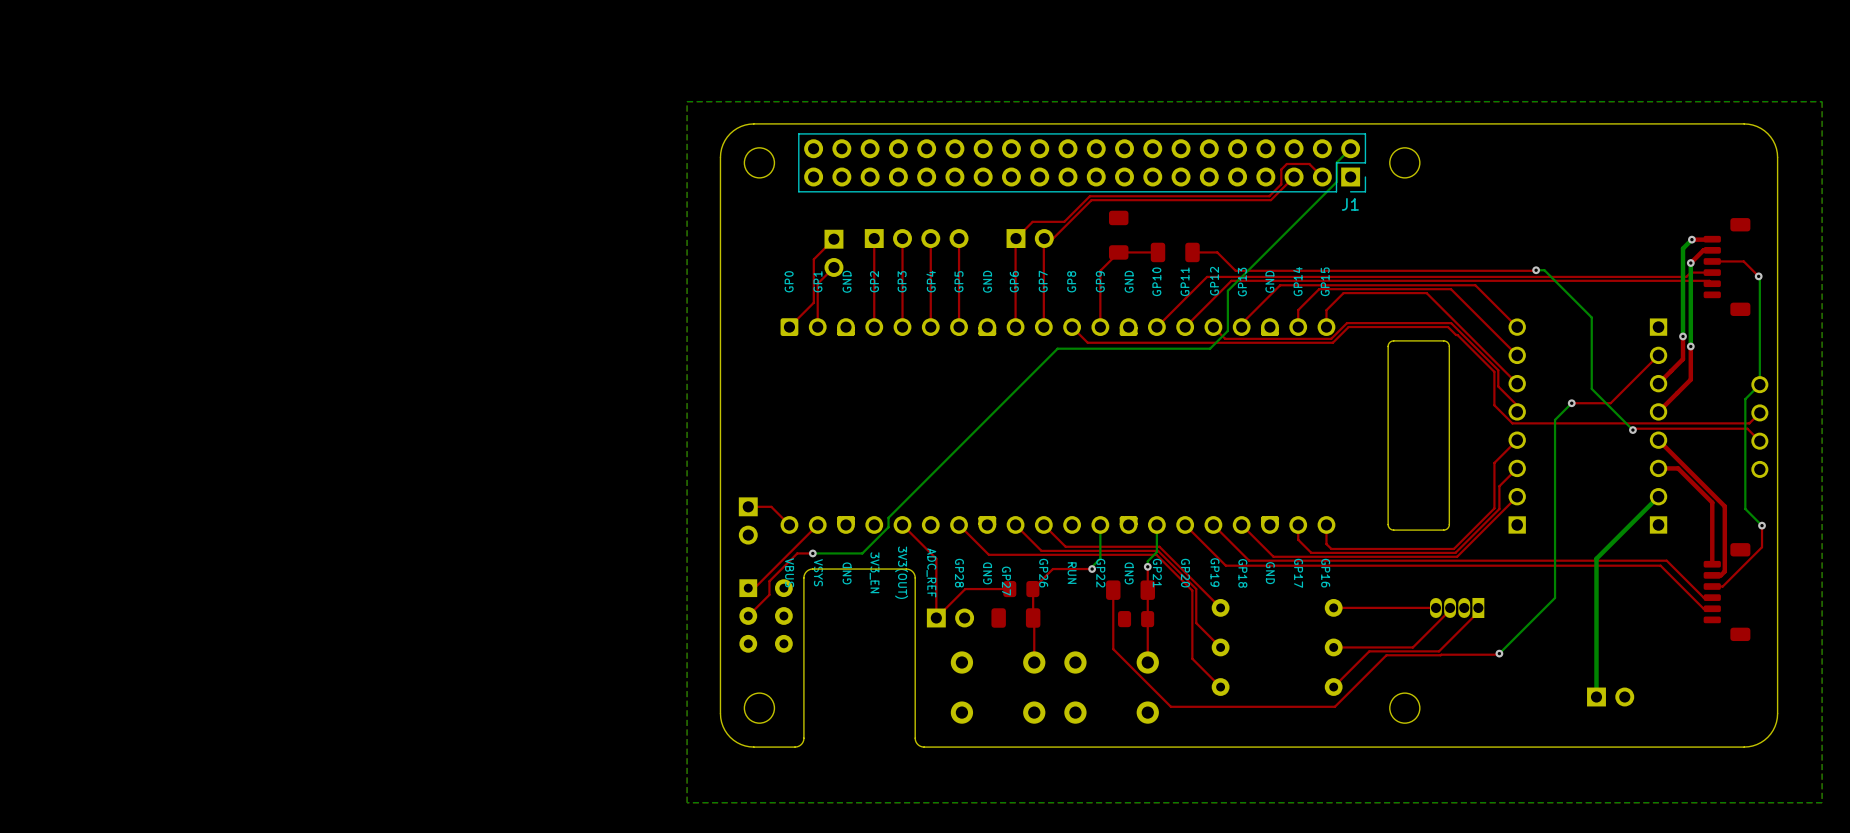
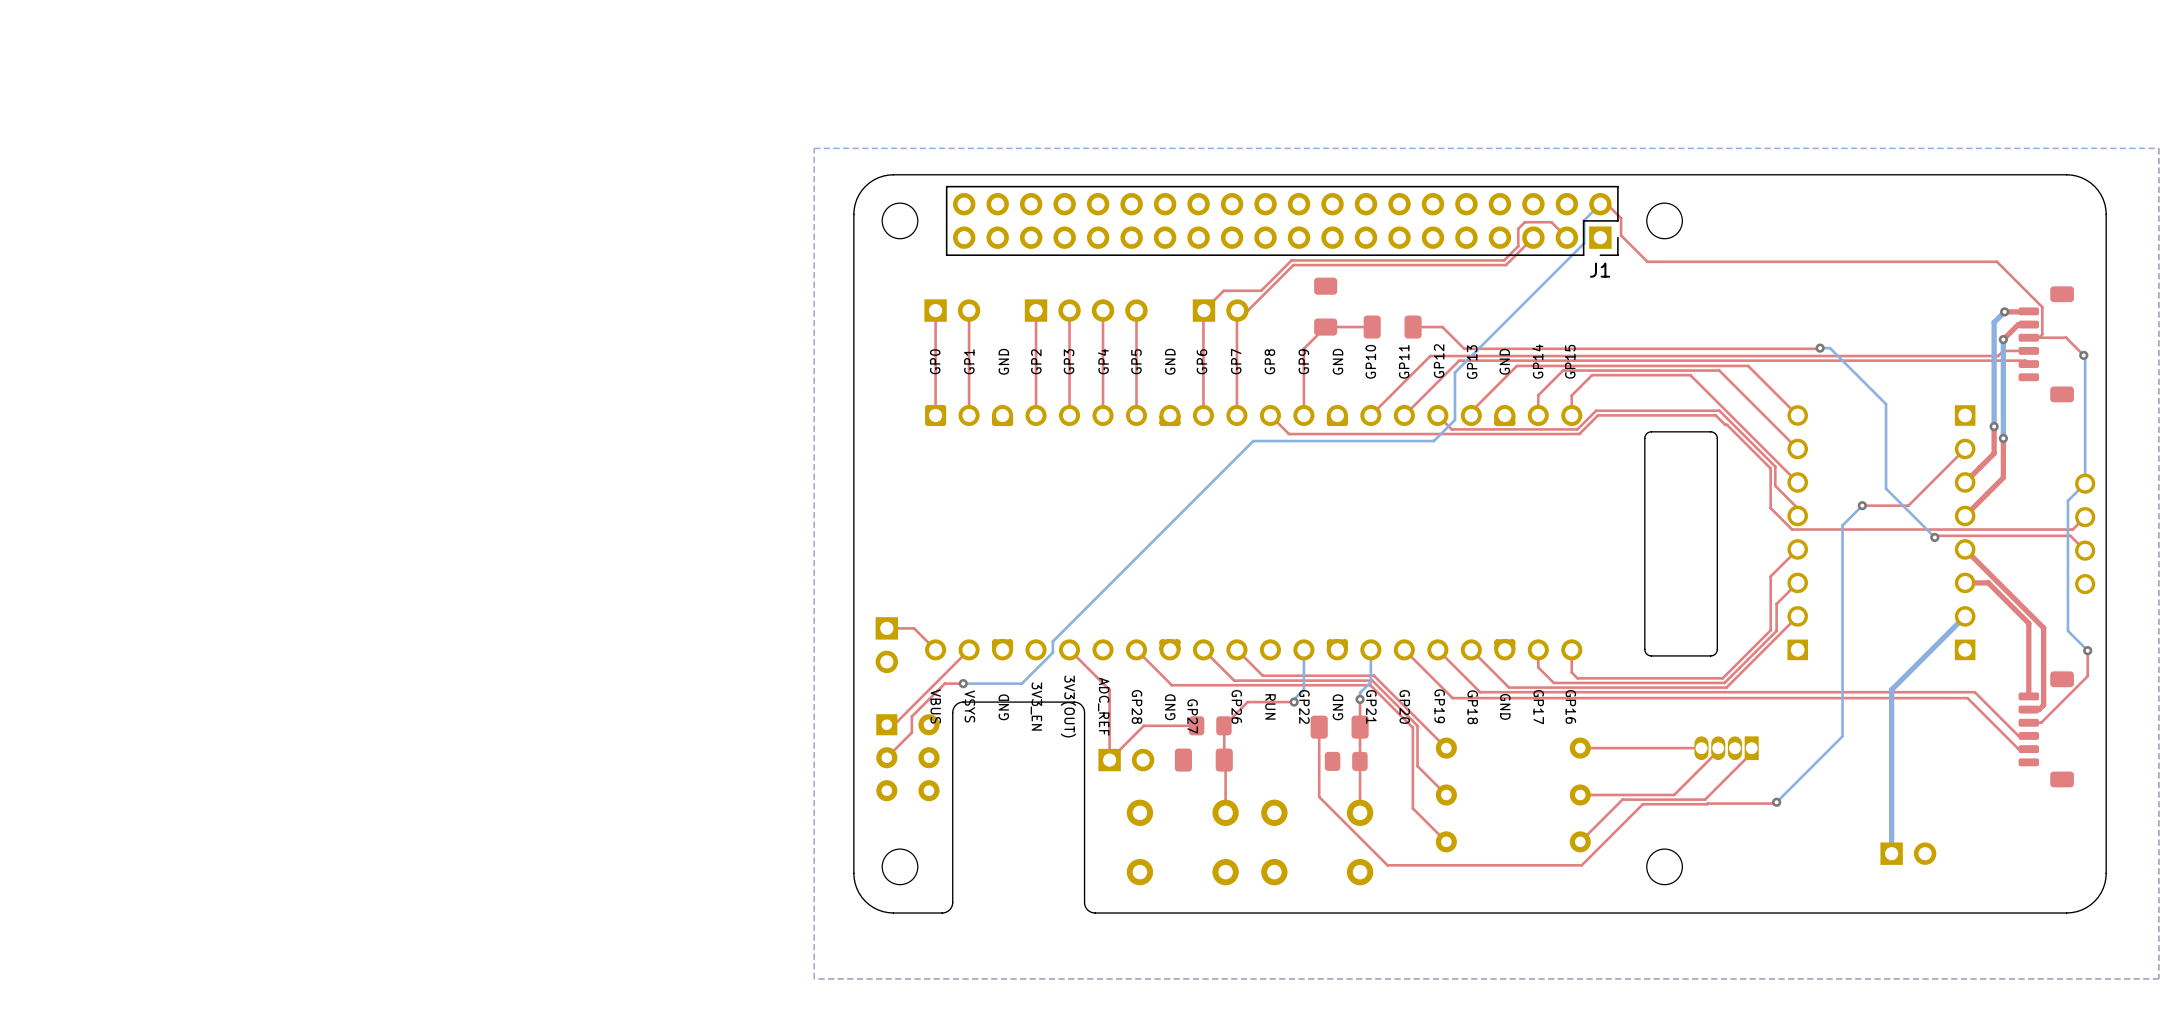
top track: none -> (1600, 204) (1606, 204) (1621, 218) (1621, 235) (1647, 261) (1996, 261) (2042, 307) (2042, 334) (2039, 337)
top track: (833, 239) (813, 259) (813, 302) (789, 327) -> (935, 310) (935, 415)
part rotation: 0° (833, 253) -> 90° counterclockwise (952, 310)
part position: (833, 253) -> (952, 310)
top track: (833, 267) (817, 283) -> (969, 310) (969, 364)

